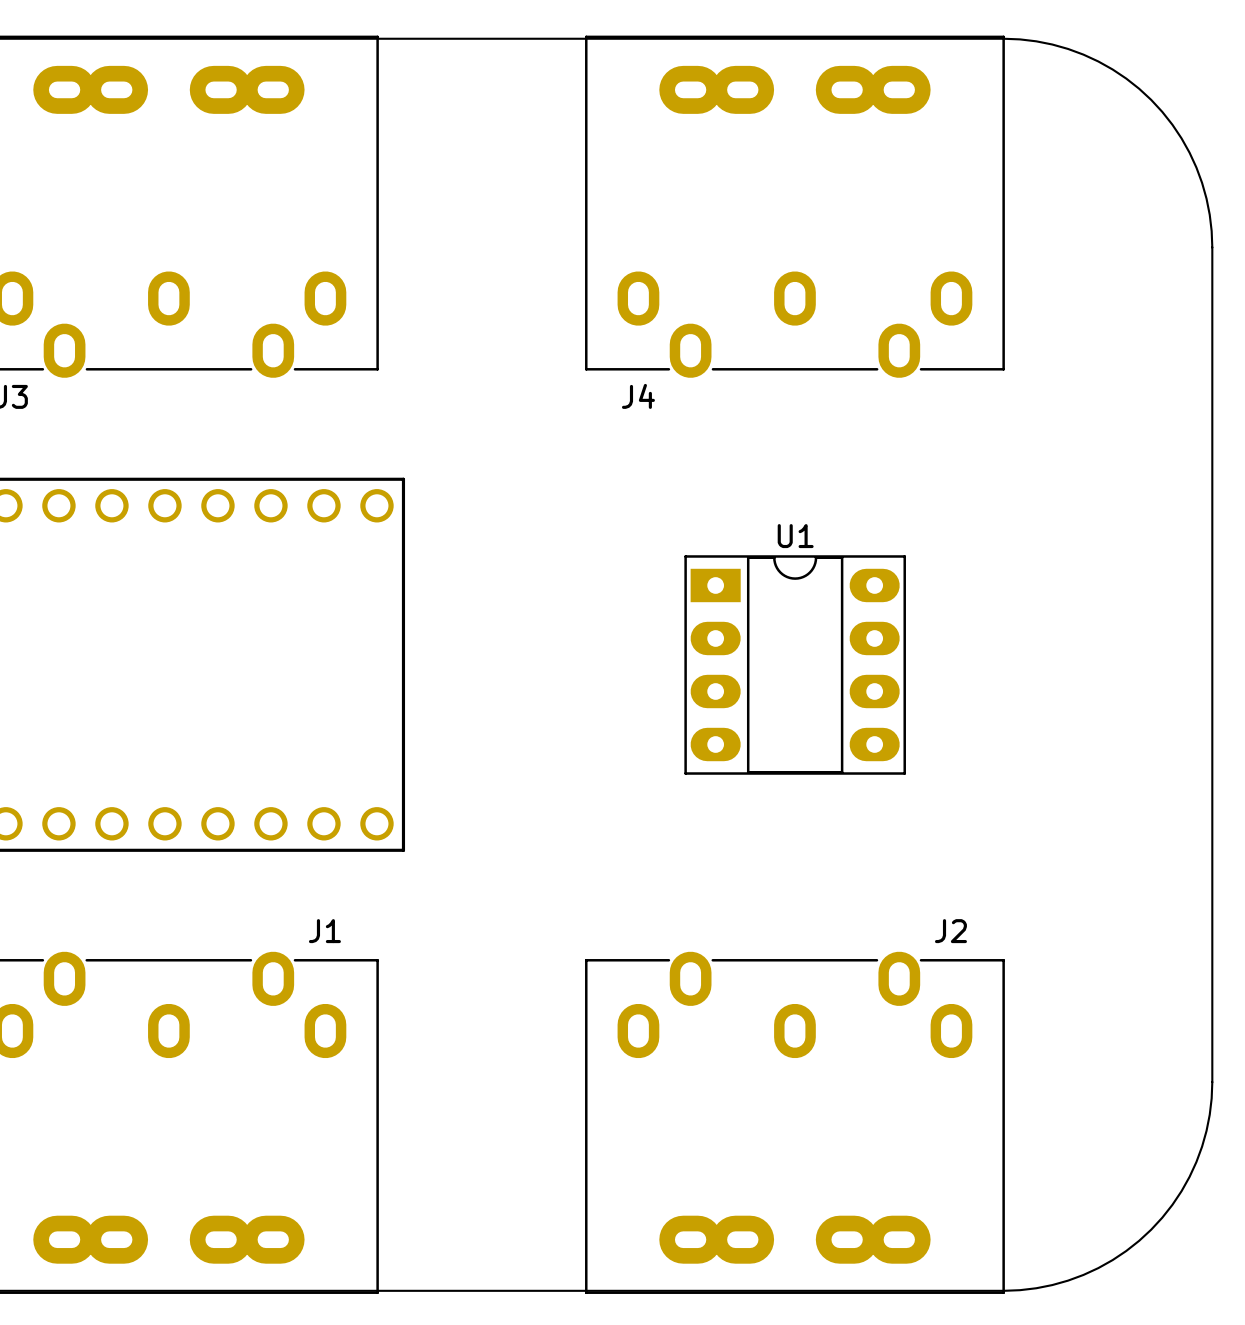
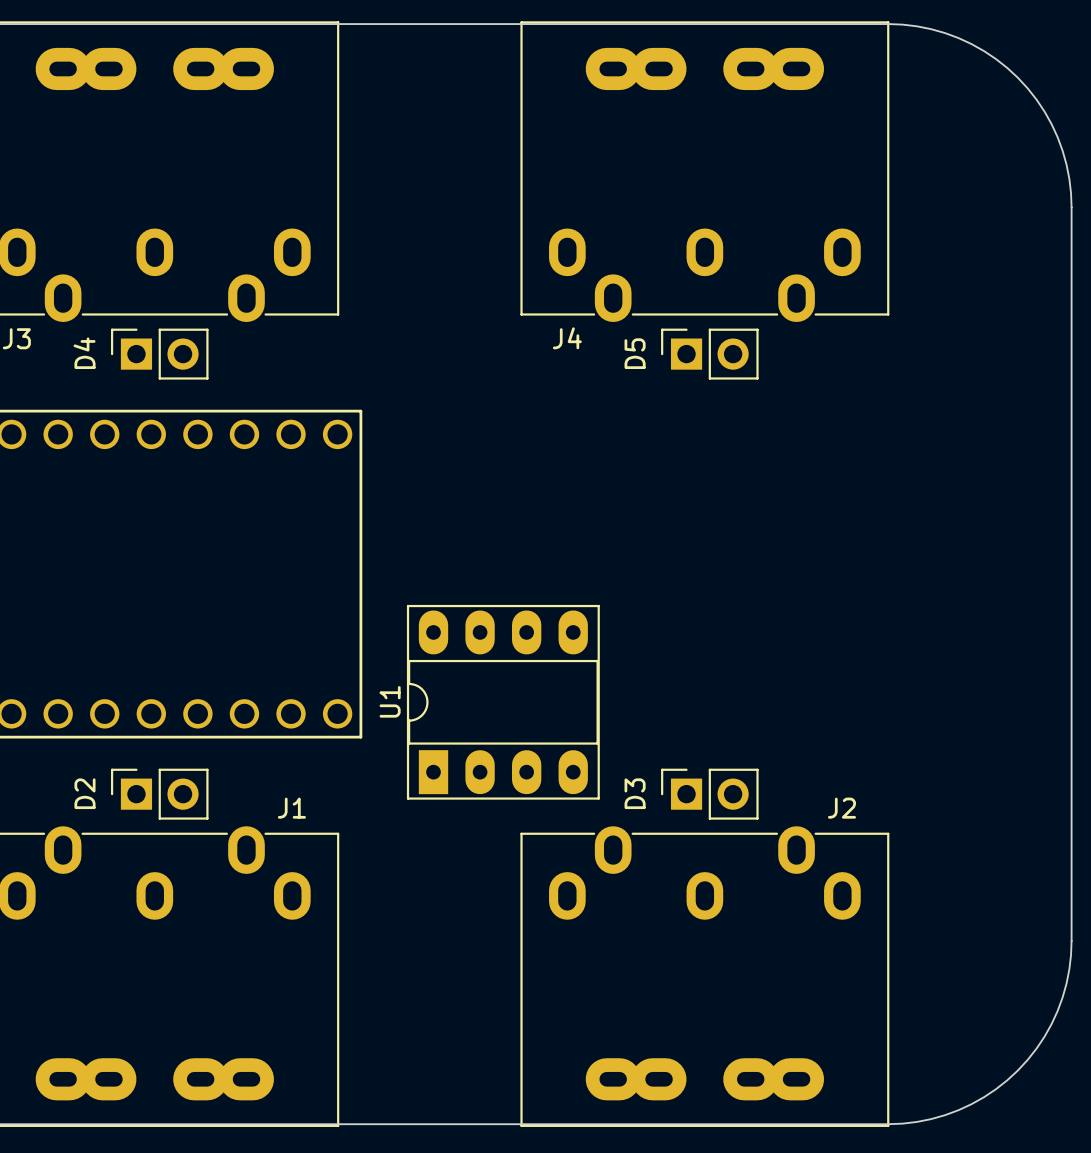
D4: none -> (159, 354)
D5: none -> (709, 354)
U1 rotation: 0° (795, 664) -> 90° counterclockwise (503, 702)
U1 position: (795, 664) -> (503, 702)
D2: none -> (159, 794)
D3: none -> (709, 794)

